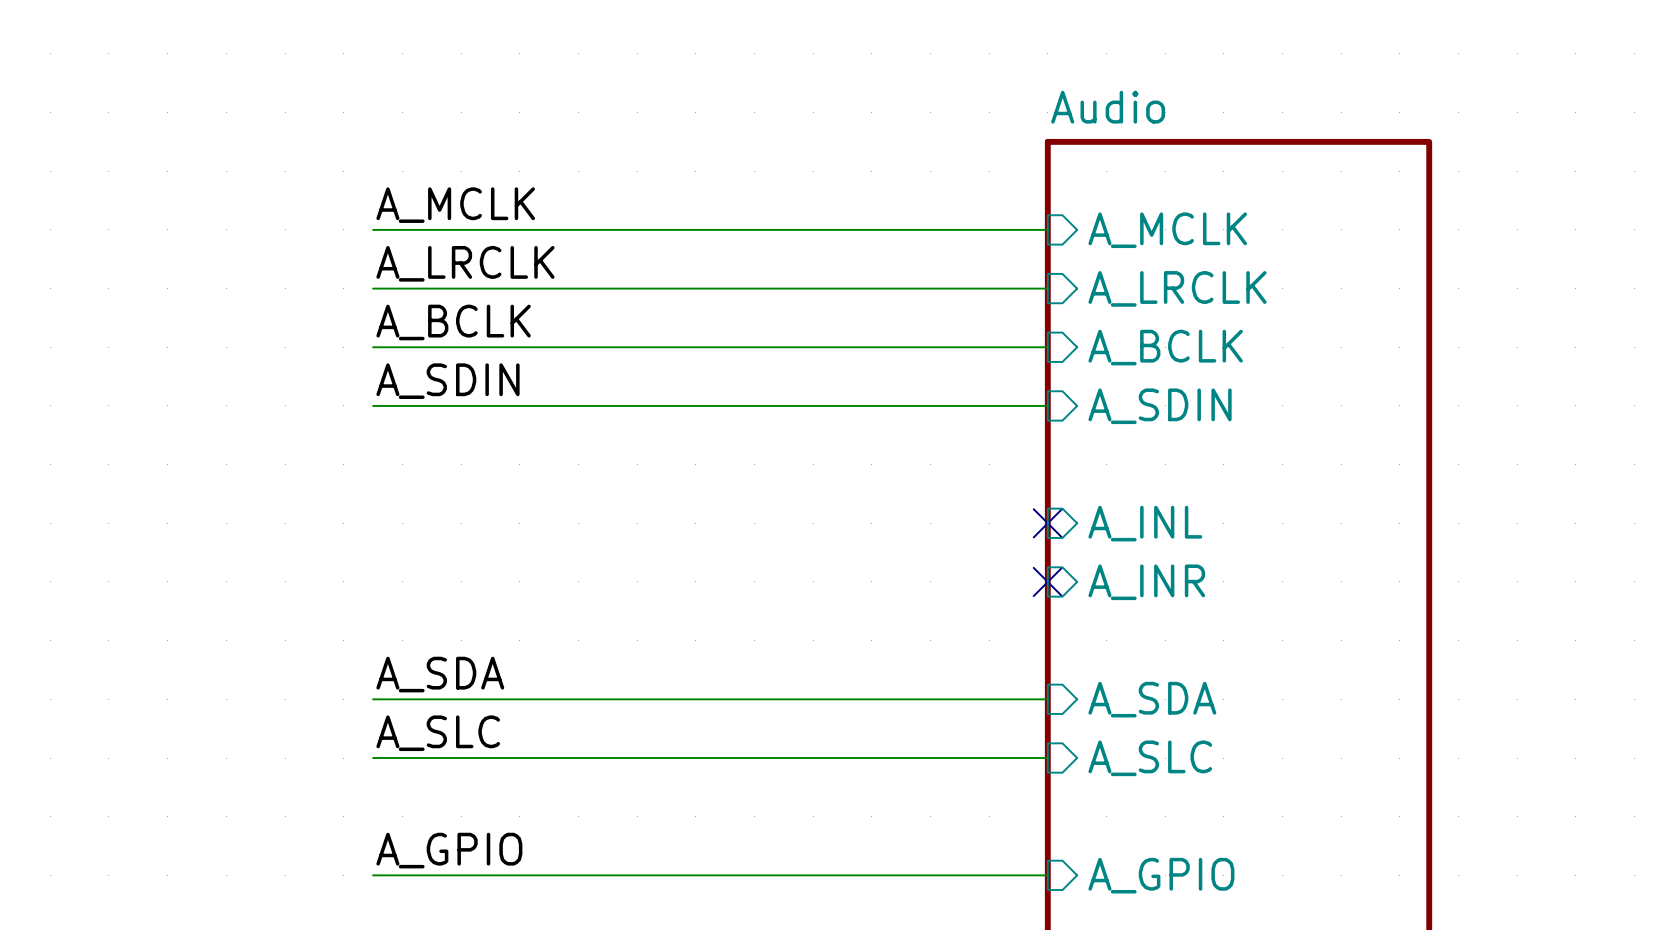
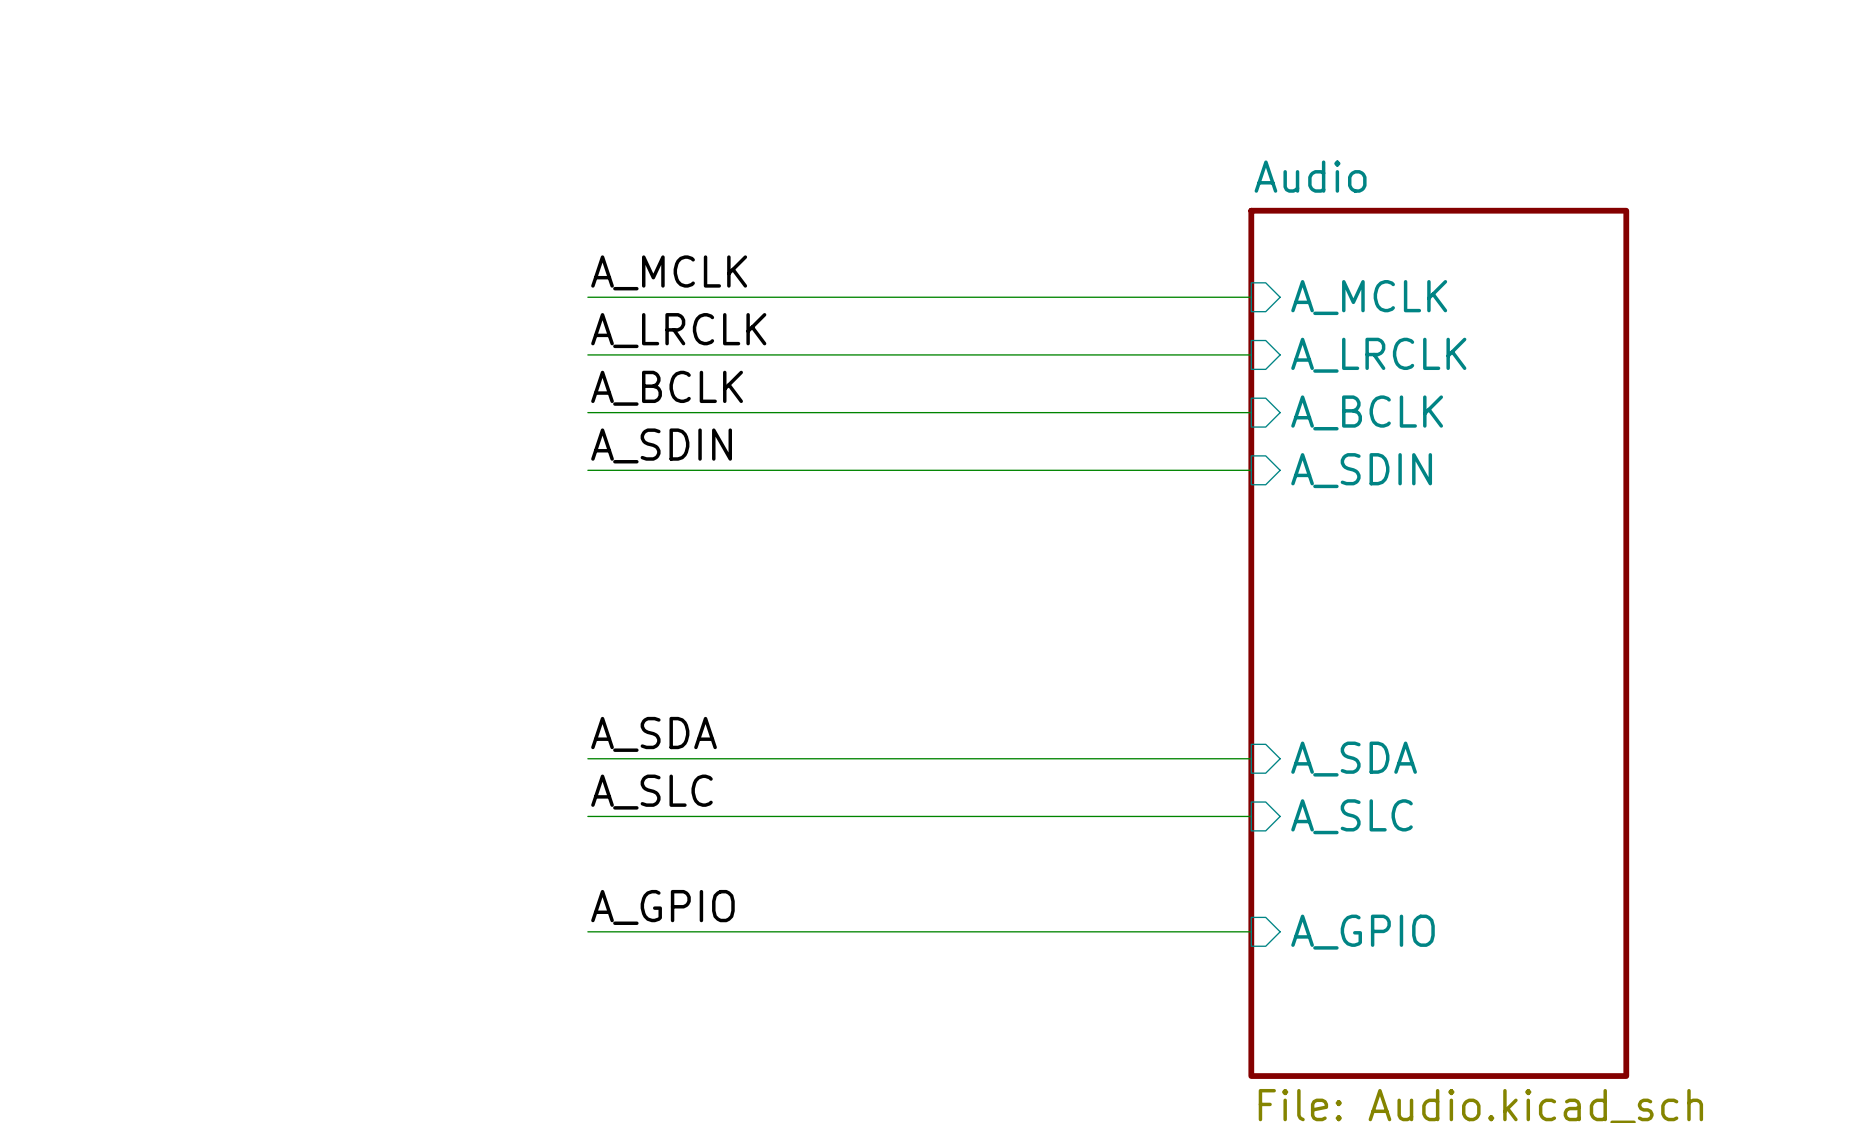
no-connect mark: (1047, 523) -> none
sheet pin: A_INL (1145, 523) -> none
no-connect mark: (1047, 581) -> none
sheet pin: A_INR (1146, 582) -> none

